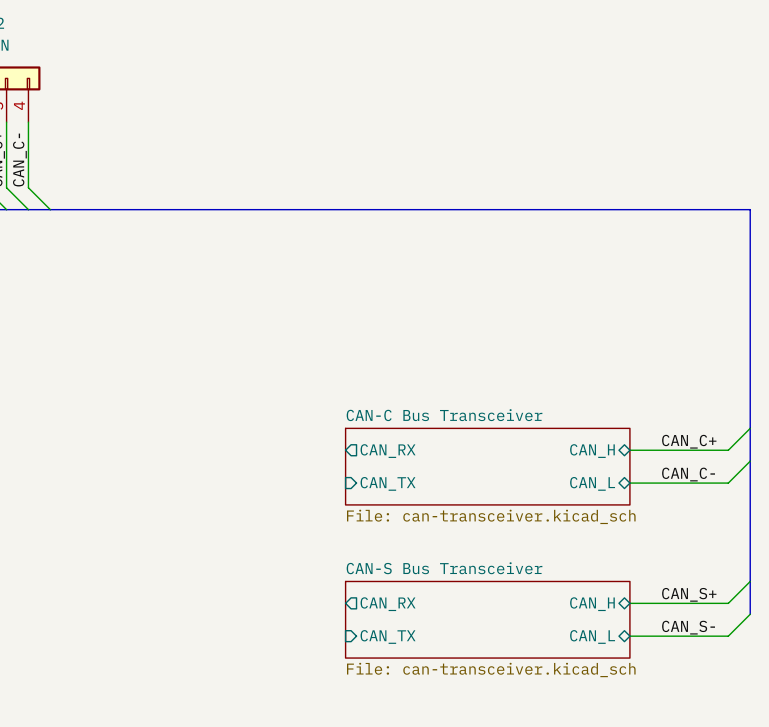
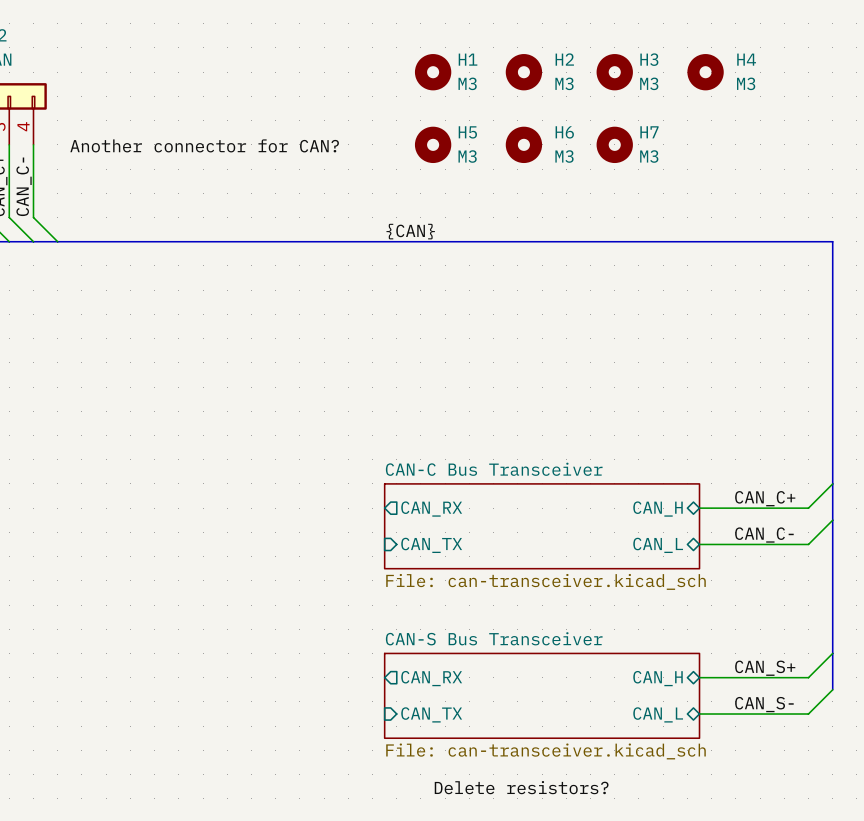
H1: none -> M3 (433, 72)
H2: none -> M3 (523, 72)
H3: none -> M3 (614, 72)
H4: none -> M3 (705, 72)
H5: none -> M3 (433, 144)
H6: none -> M3 (523, 144)
H7: none -> M3 (614, 144)
label: none -> Another connector for CAN? (204, 145)
label: none -> {CAN} (410, 231)
label: none -> Delete resistors? (521, 787)

